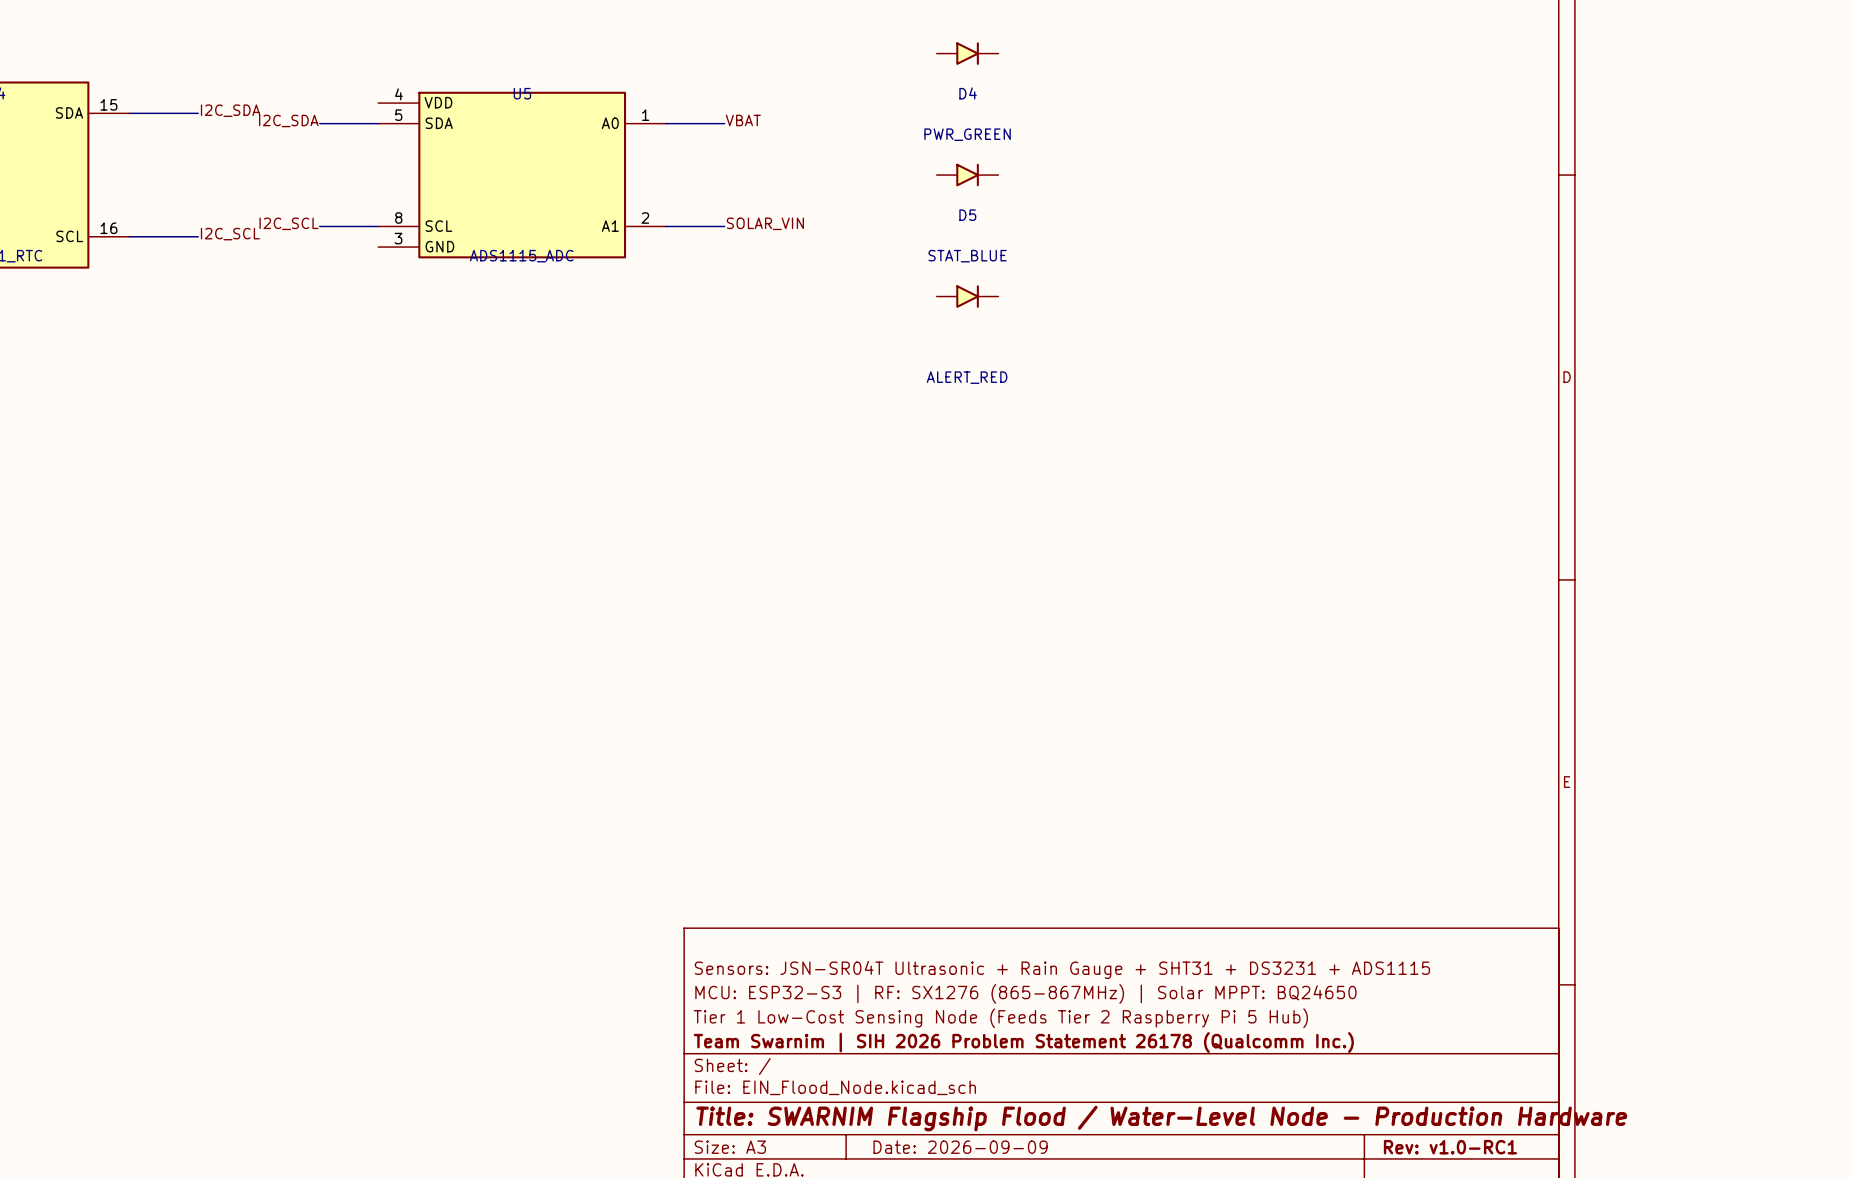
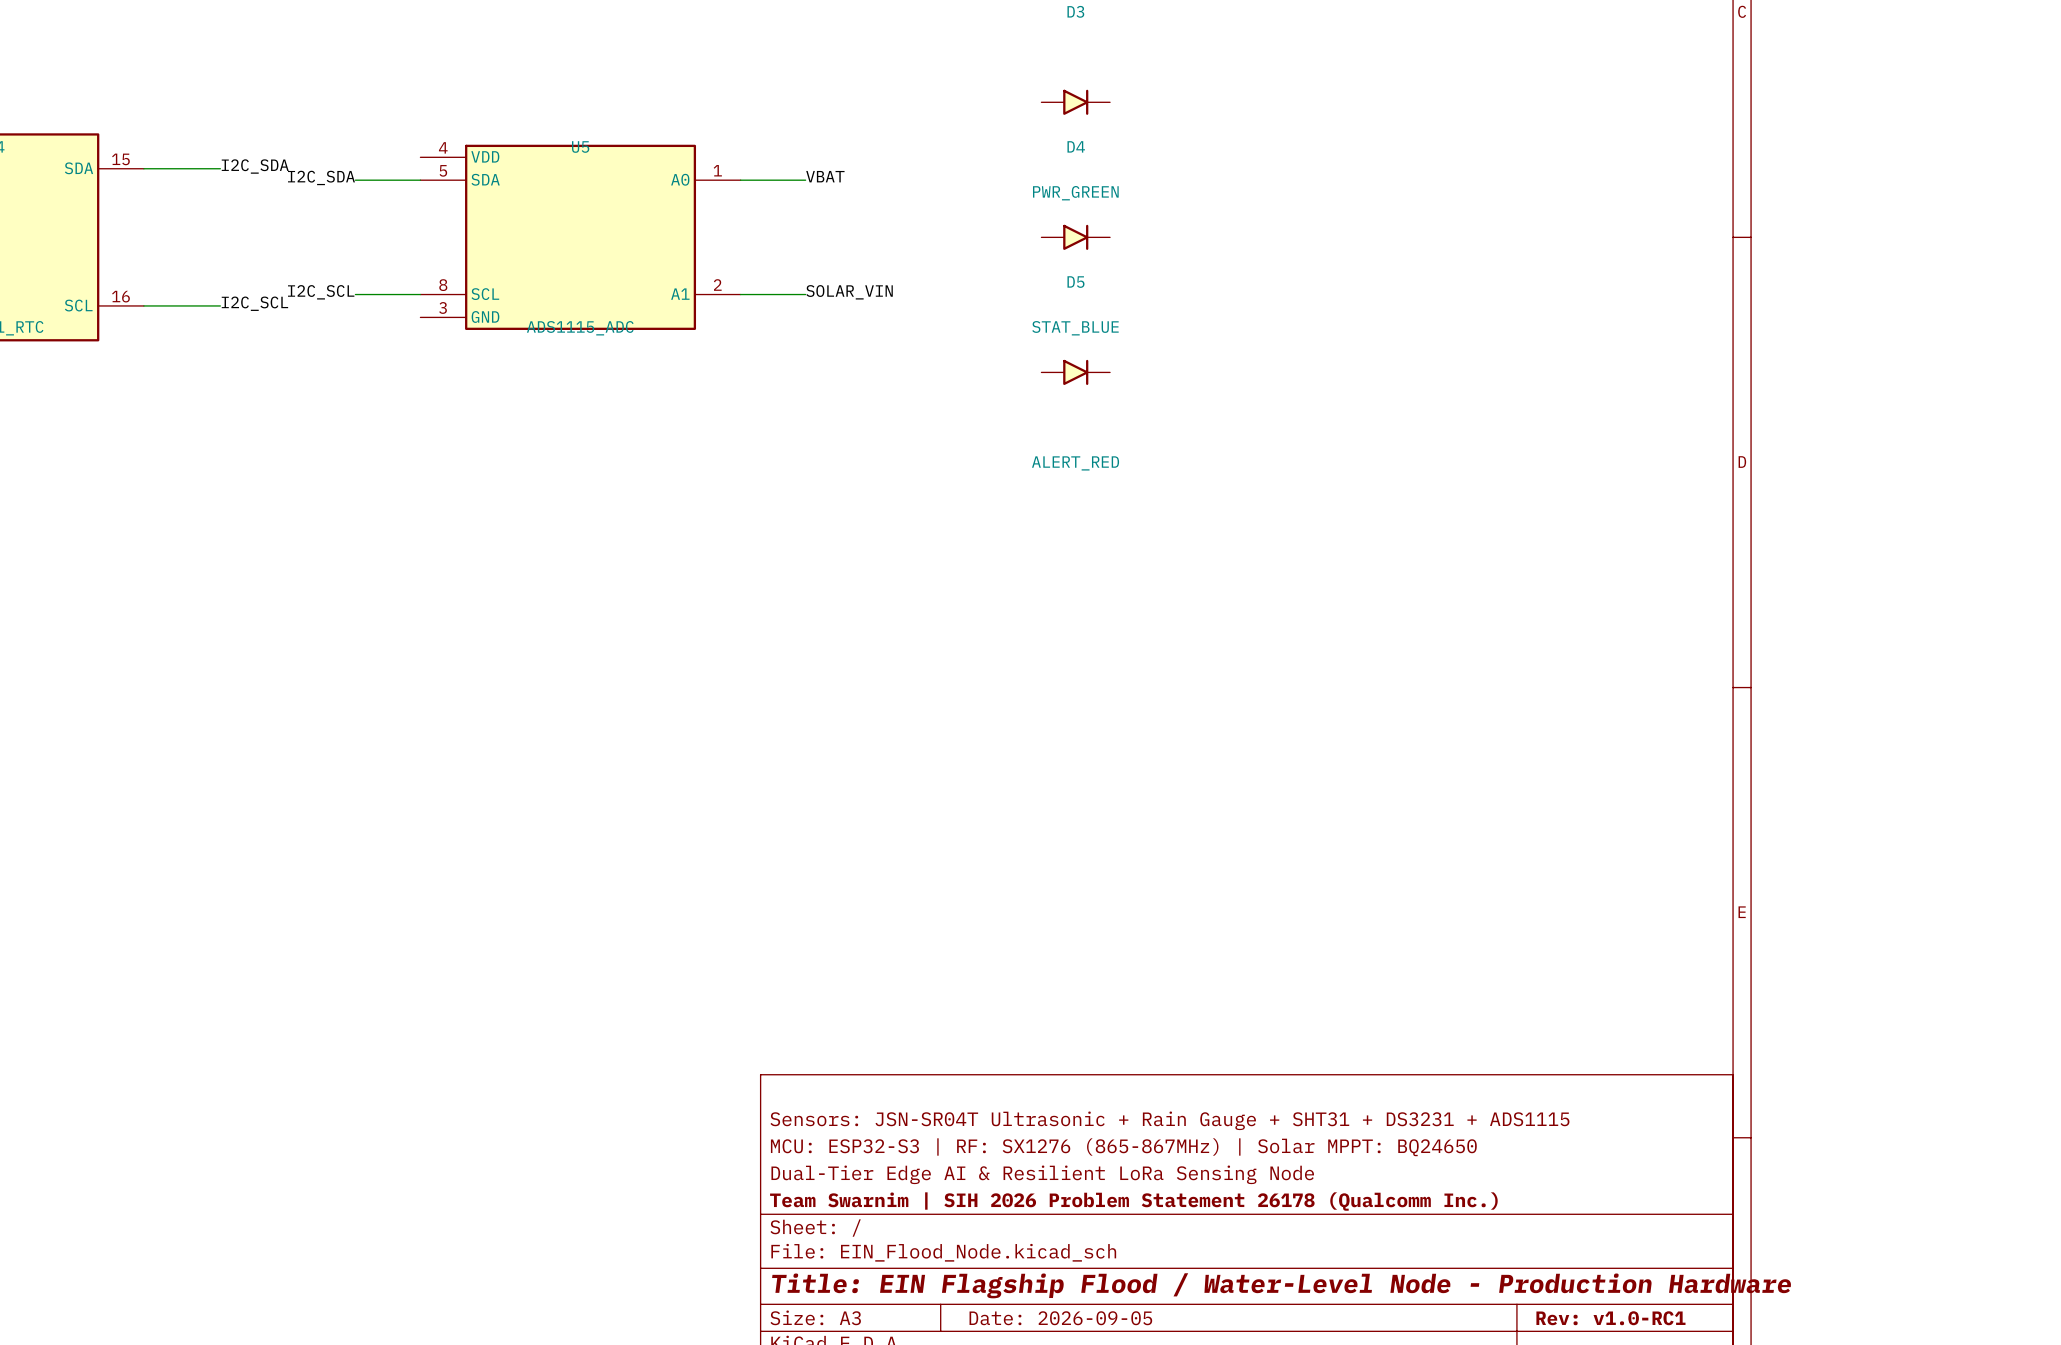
title block: Tier 1 Low-Cost Sensing Node (Feeds Tier 2 Raspberry Pi 5 Hub) (1000, 1018) -> Dual-Tier Edge AI & Resilient LoRa Sensing Node (1042, 1174)
title block: Title: SWARNIM Flagship Flood / Water-Level Node - Production Hardware (1161, 1118) -> Title: EIN Flagship Flood / Water-Level Node - Production Hardware (1281, 1285)
title block: Date: 2026-09-09 (960, 1147) -> Date: 2026-09-05 (1060, 1318)

